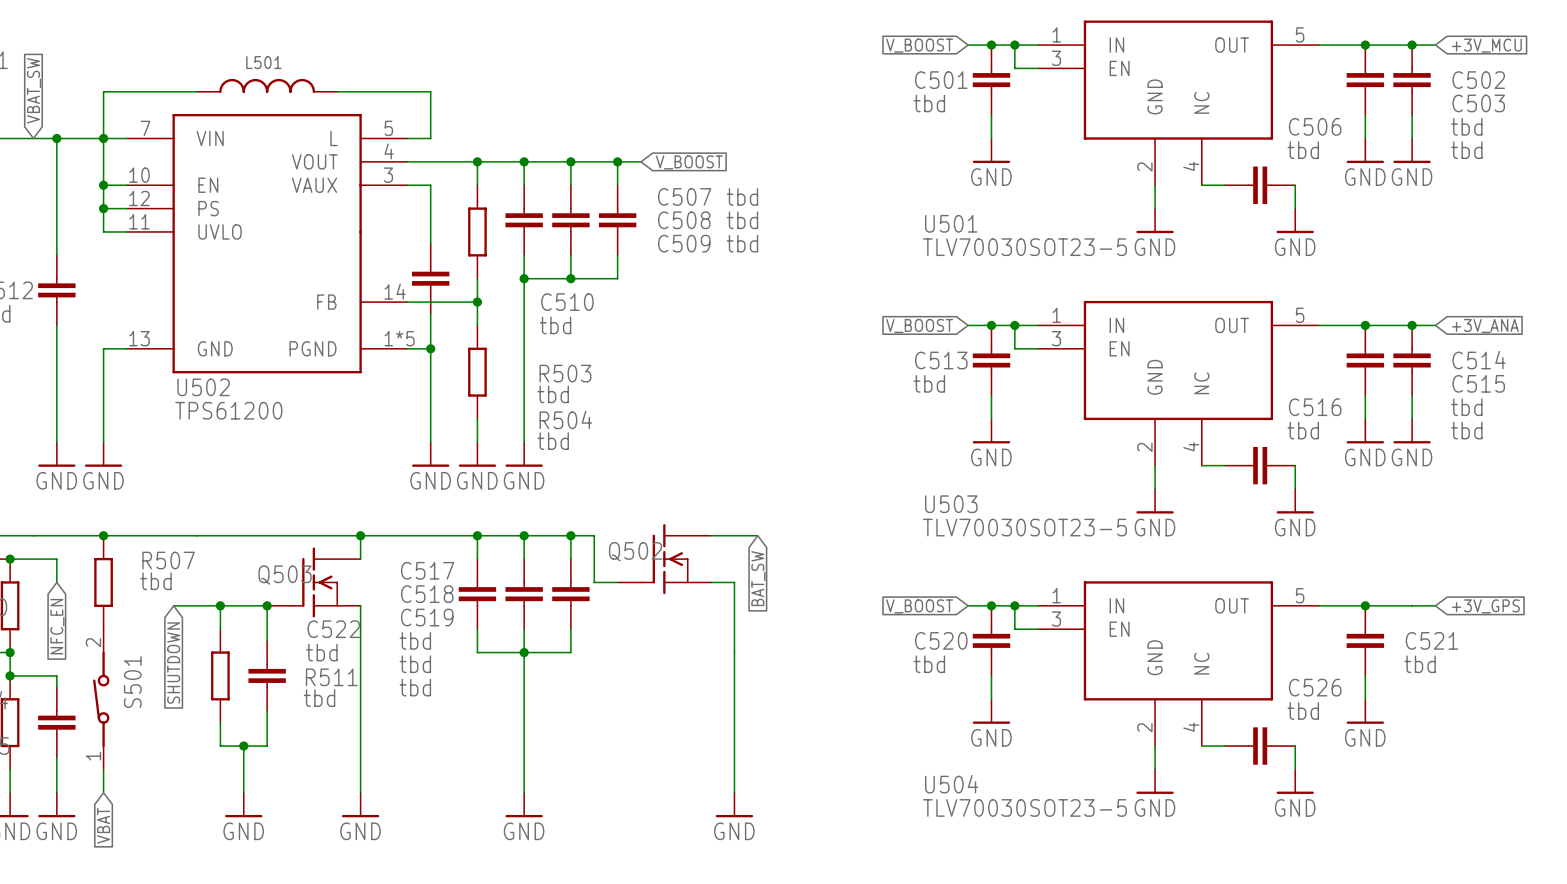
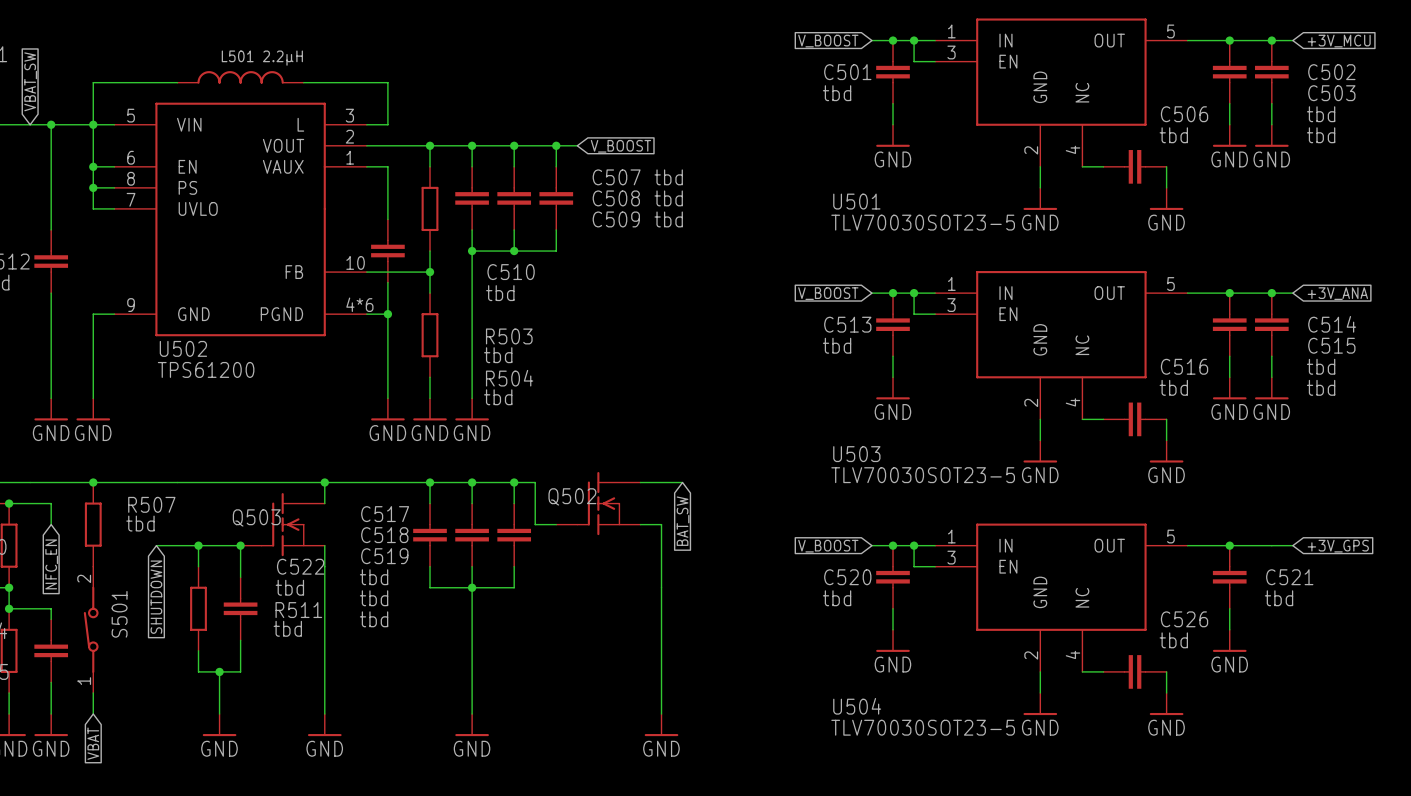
L501 value: none -> 2.2µH (282, 58)
U502 symbol: [126, 113, 408, 374] -> [114, 102, 367, 337]

